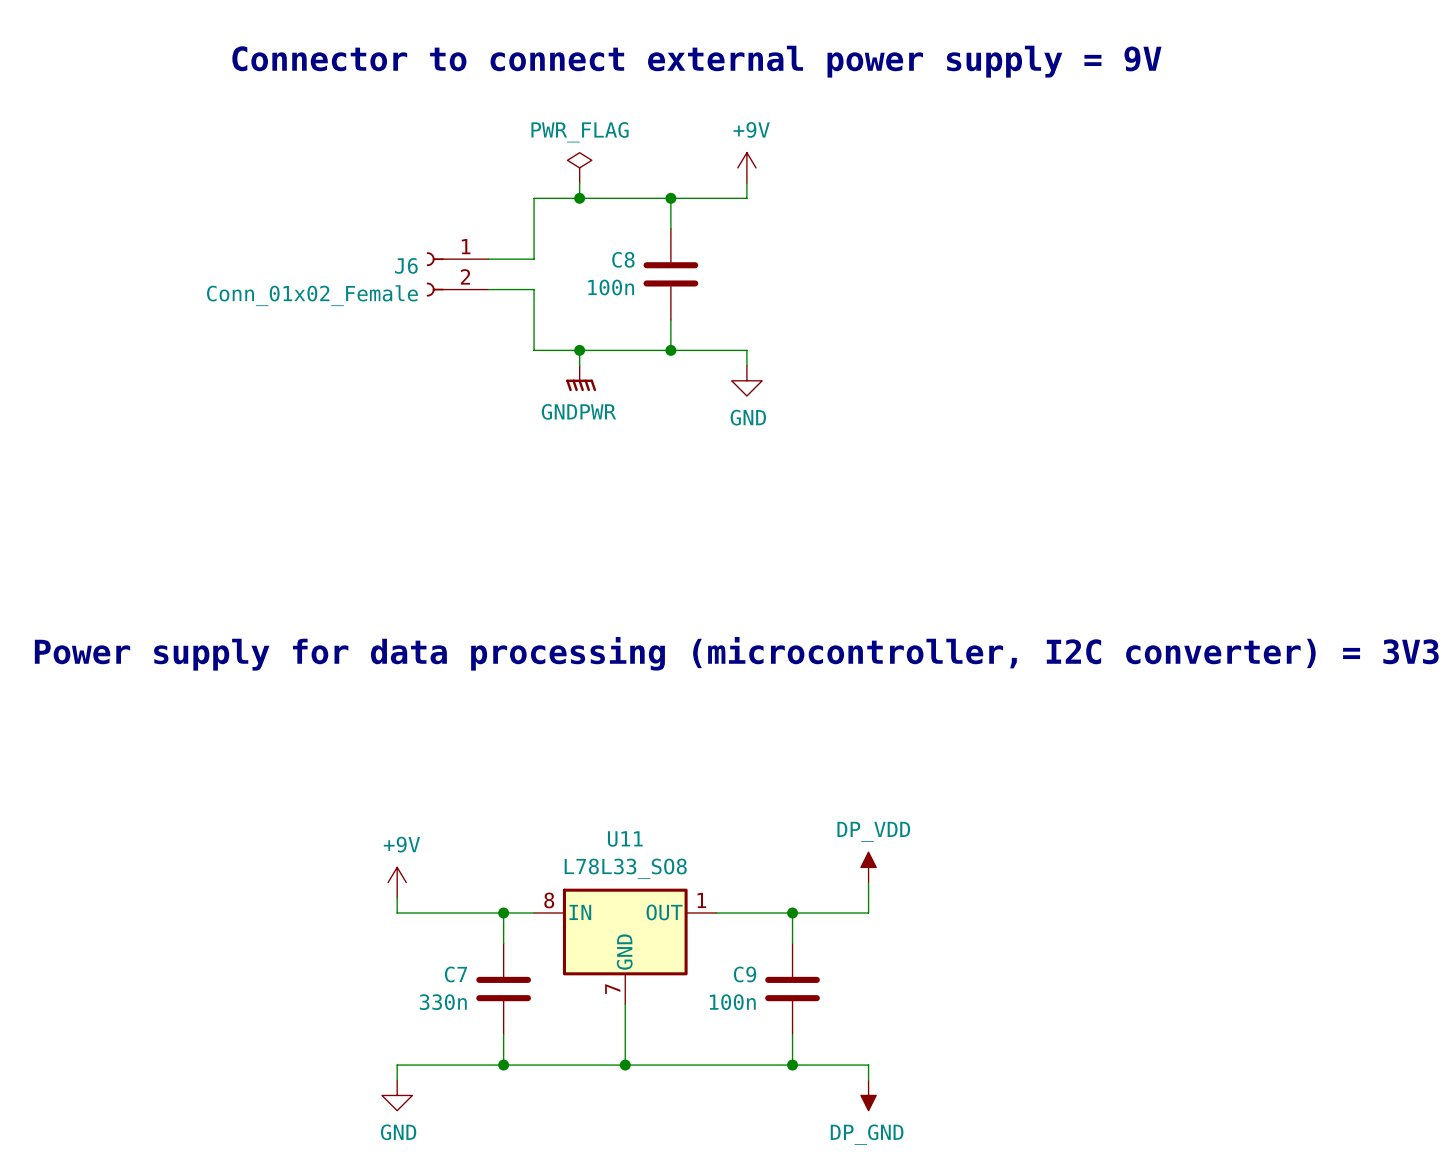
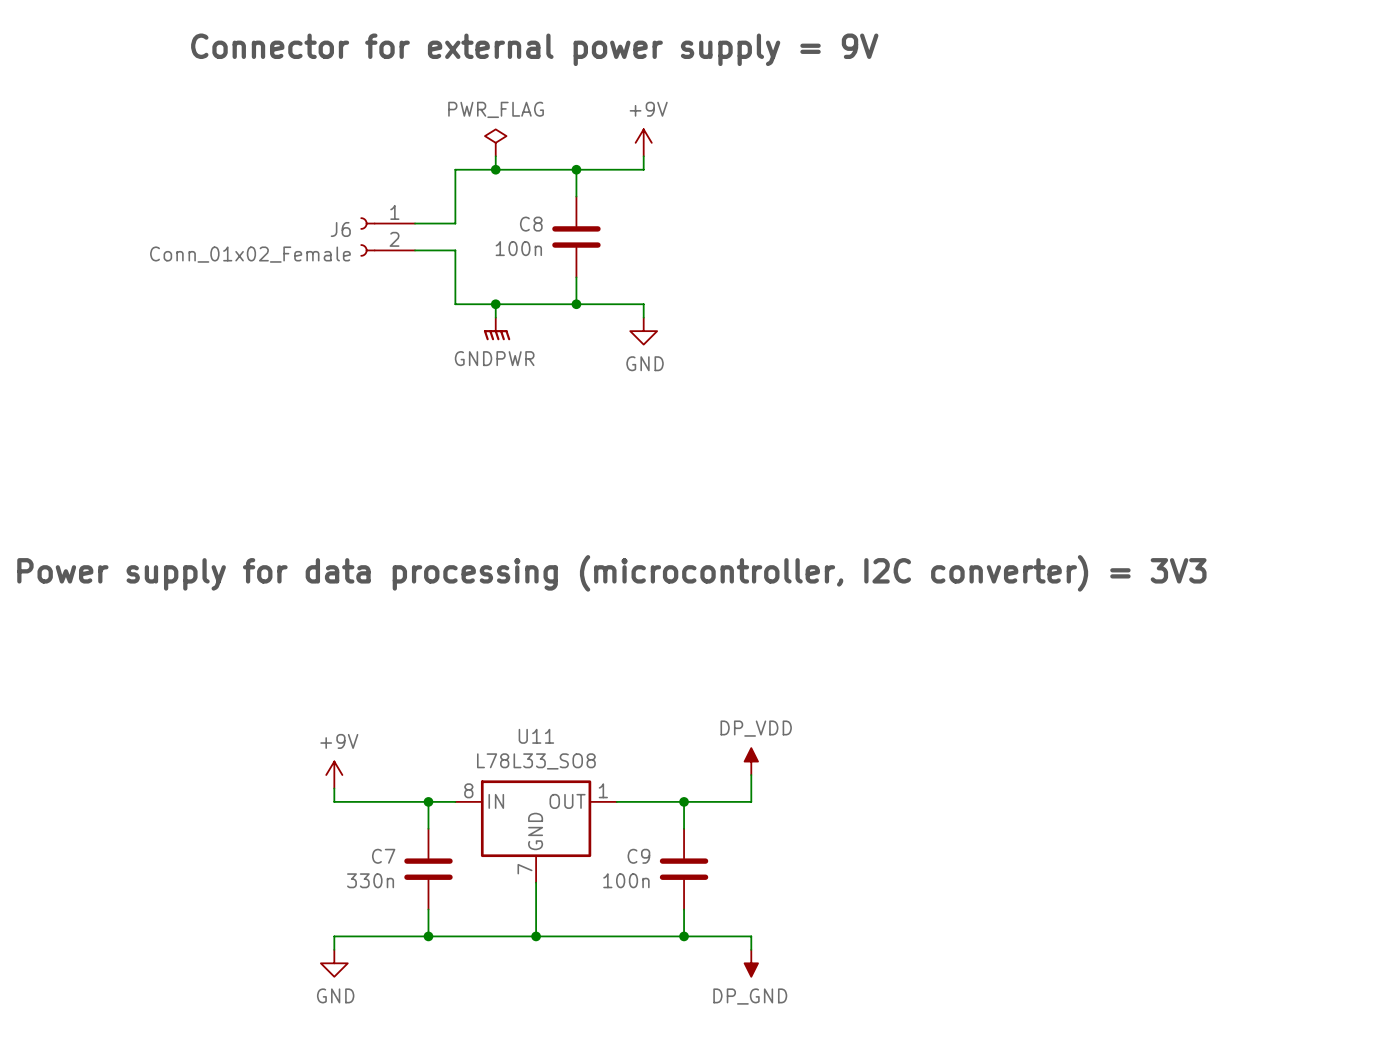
text: Connector to connect external power supply = 9V (696, 61) -> Connector for external power supply = 9V (534, 49)

